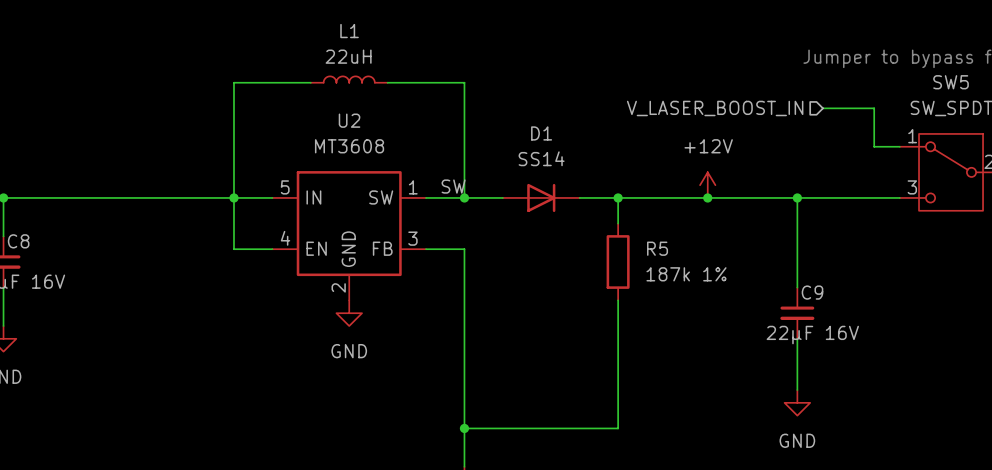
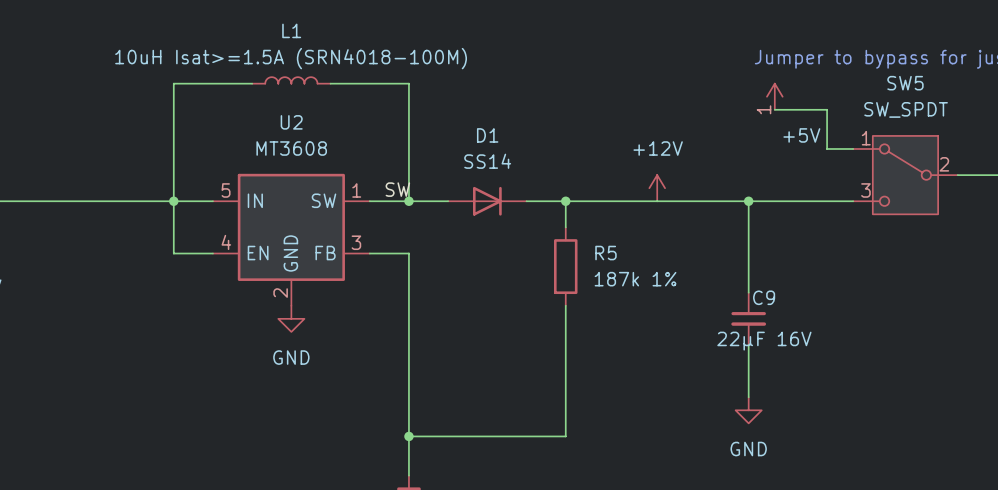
L1 value: 22uH (348, 56) -> 10uH Isat>=1.5A (SRN4018-100M) (291, 58)
power symbol: none -> +5V (774, 96)
hierarchical label: V_LASER_BOOST_IN (715, 108) -> none
junction: (707, 197) -> none

